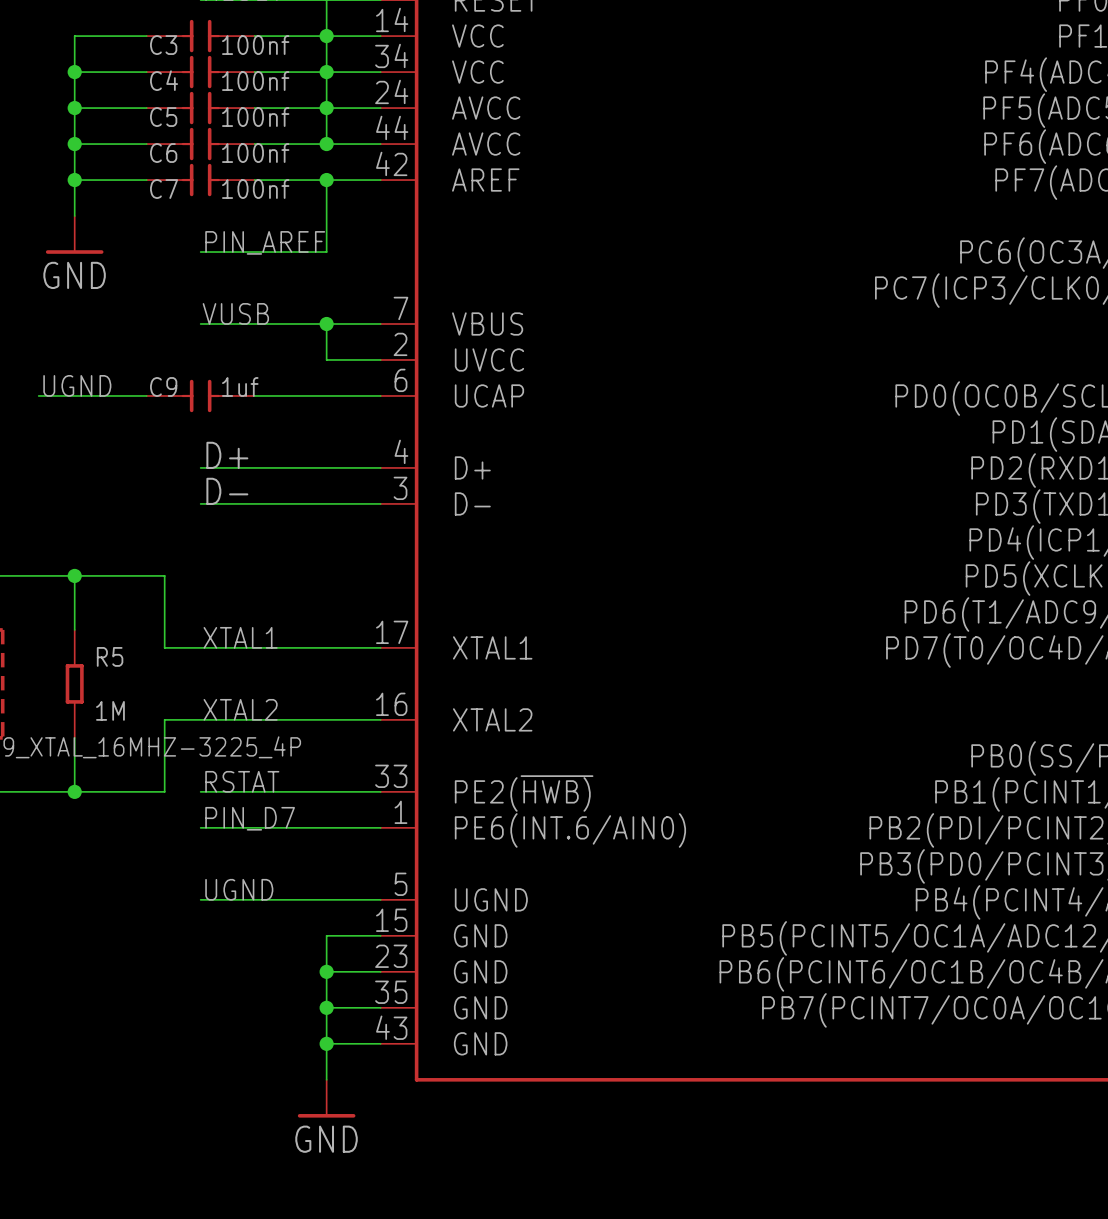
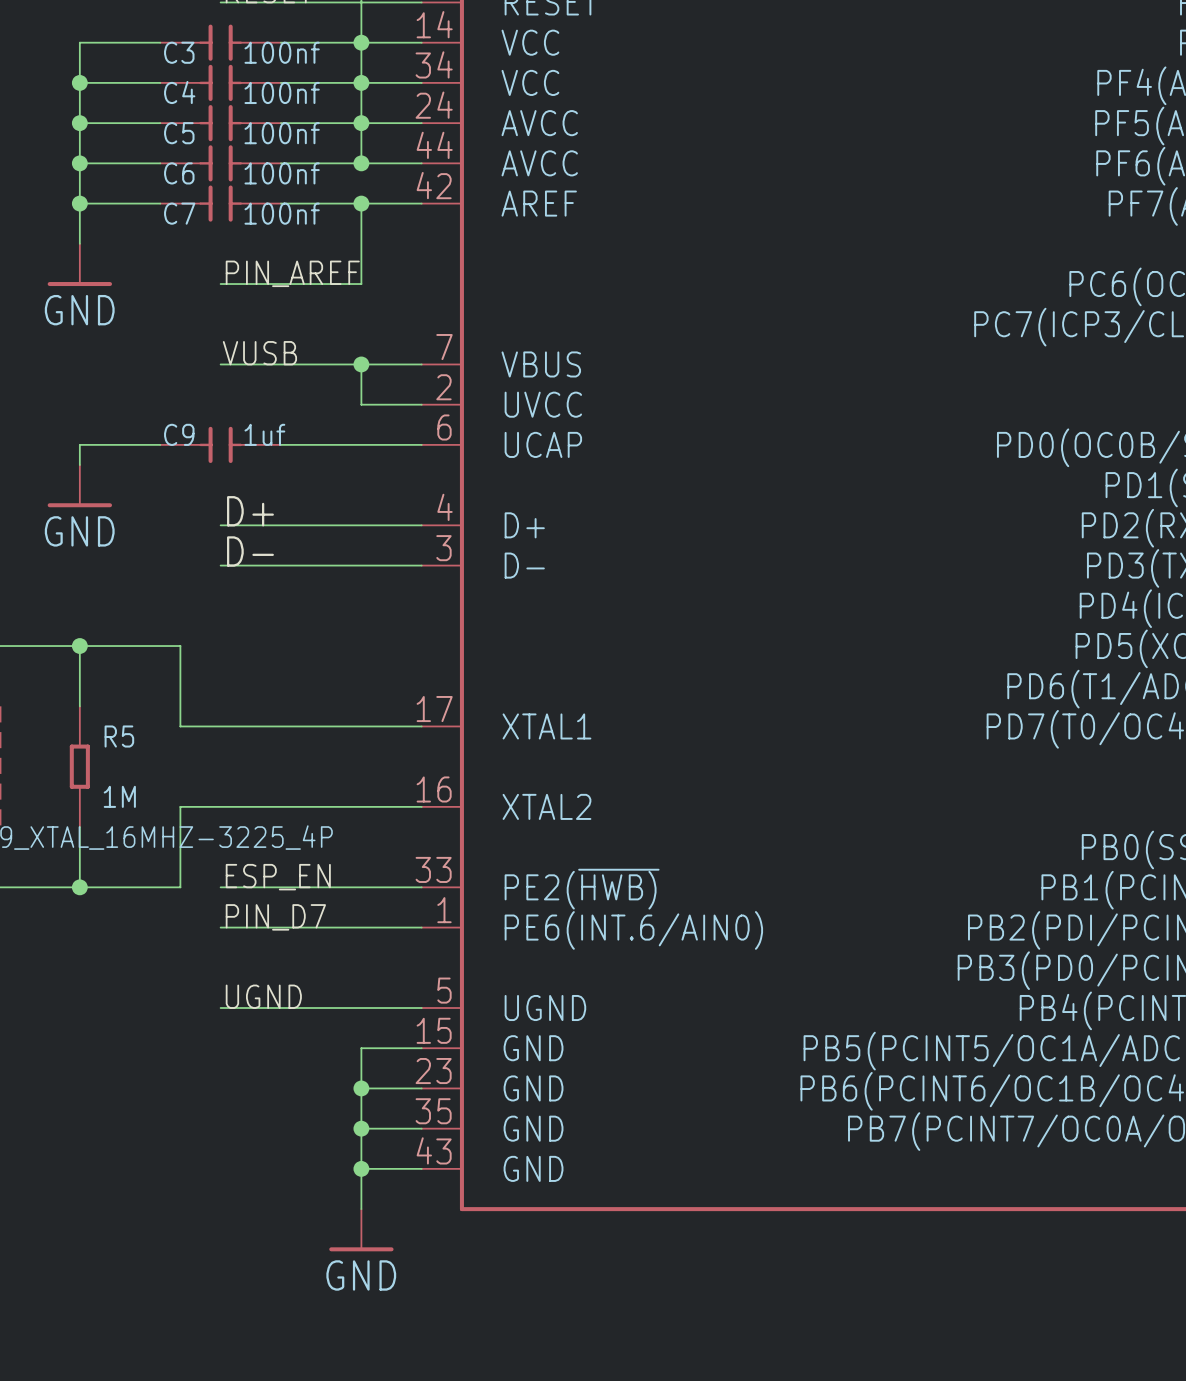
label: UGND (77, 385) -> none
wire: (38, 395) (74, 395) -> (79, 465) (79, 444)
power symbol: none -> GND (79, 486)
label: XTAL1 (240, 637) -> none
label: XTAL2 (240, 709) -> none
label: RSTAT (242, 781) -> ESP_EN (278, 877)

